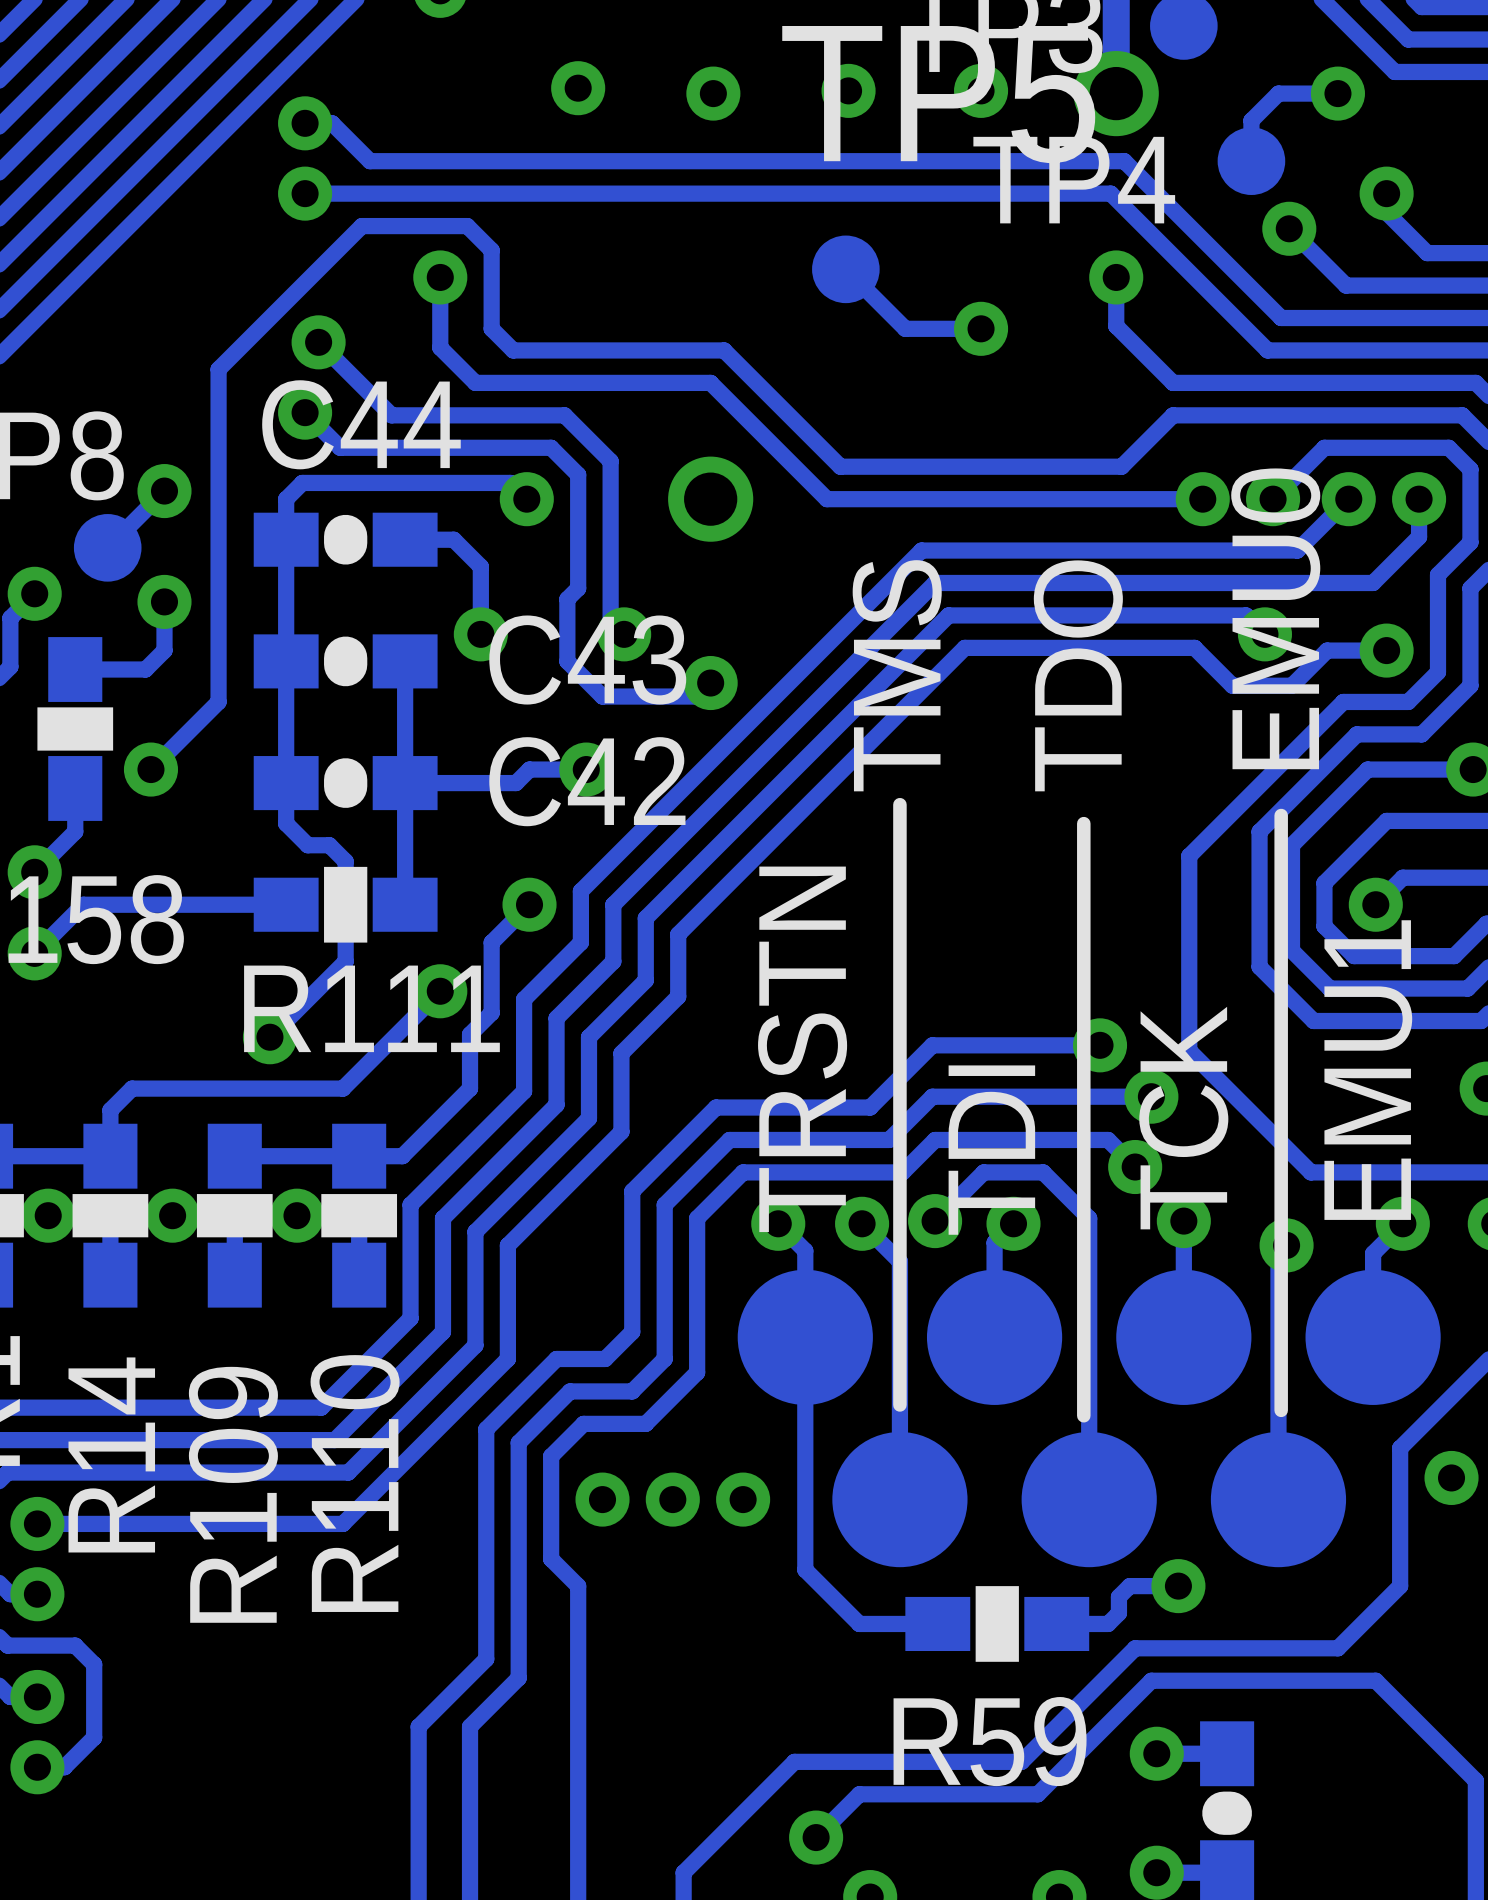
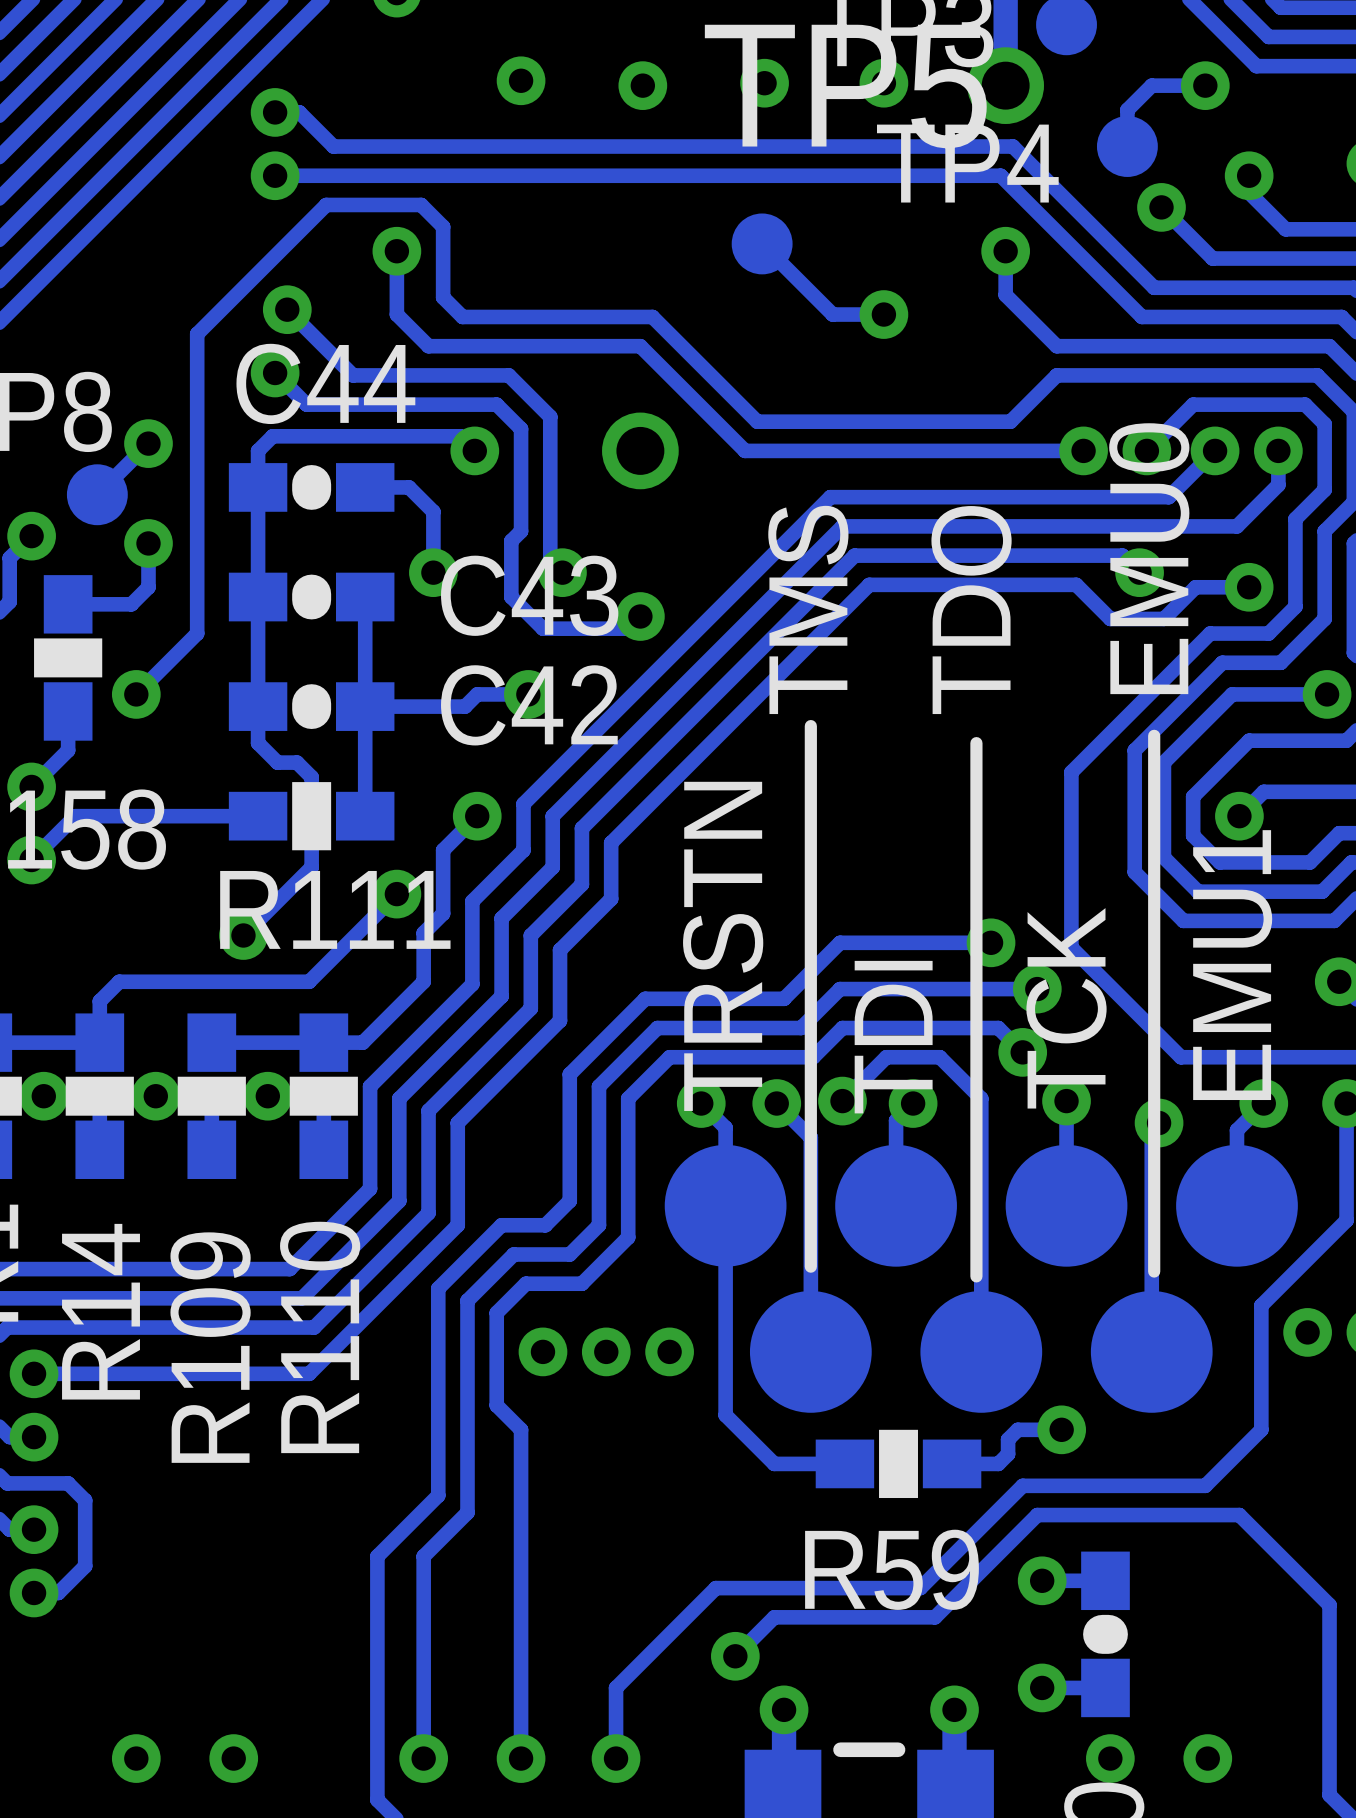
track: (981, 328) (905, 328) -> (883, 314) (832, 314) (815, 297)
via position: (981, 328) -> (883, 314)

